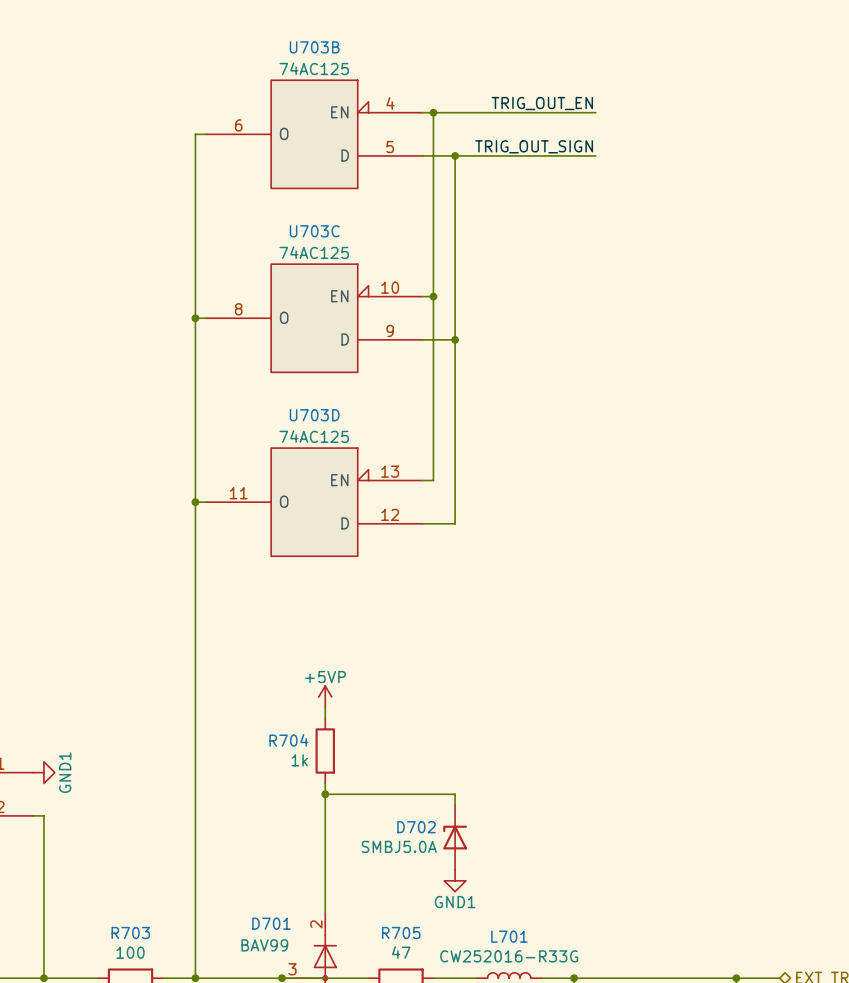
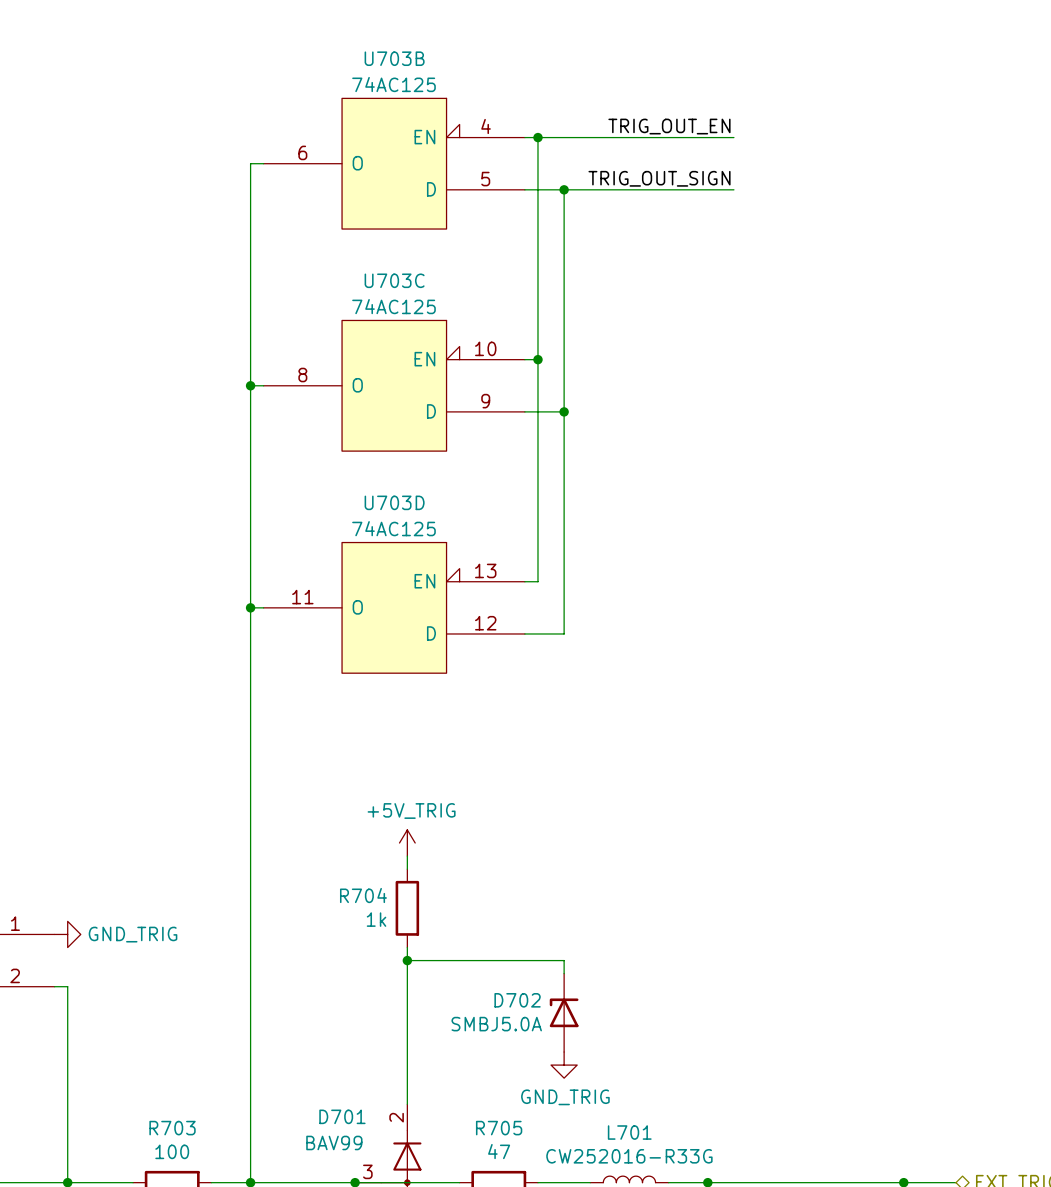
power symbol: +5VP (325, 696) -> +5V_TRIG (407, 843)
power symbol: GND1 (43, 772) -> GND_TRIG (67, 934)
power symbol: GND1 (455, 880) -> GND_TRIG (564, 1065)

